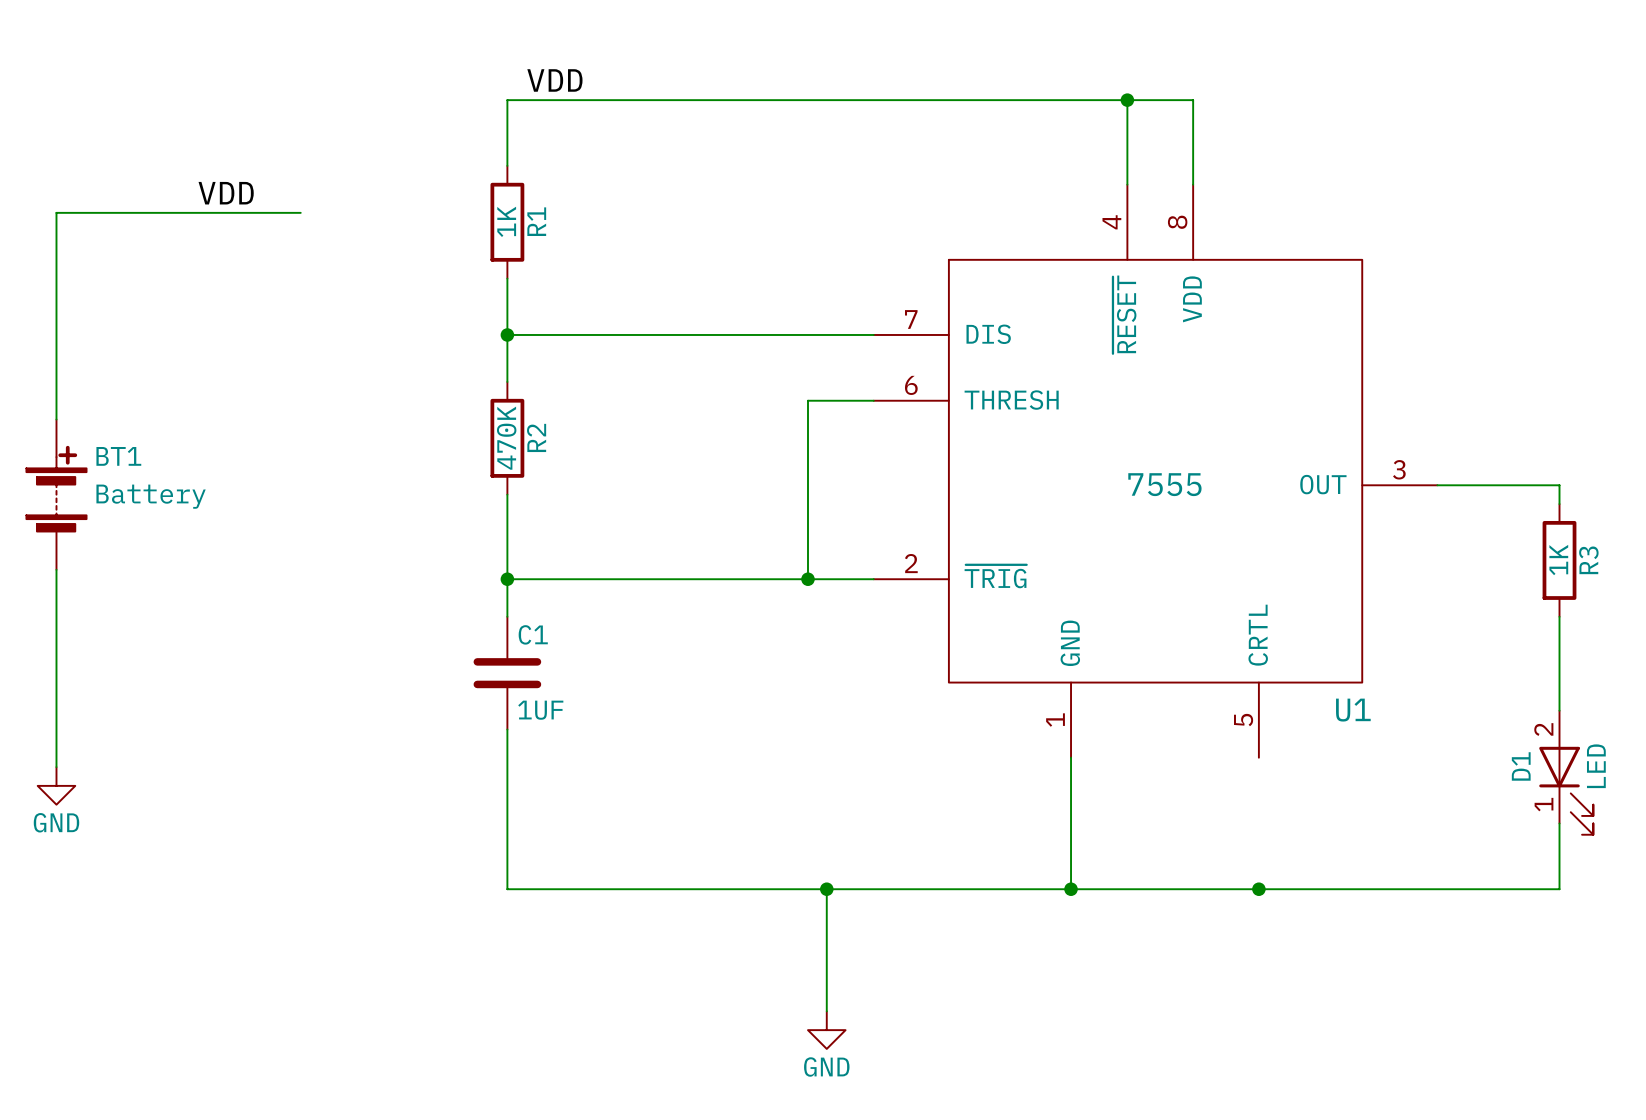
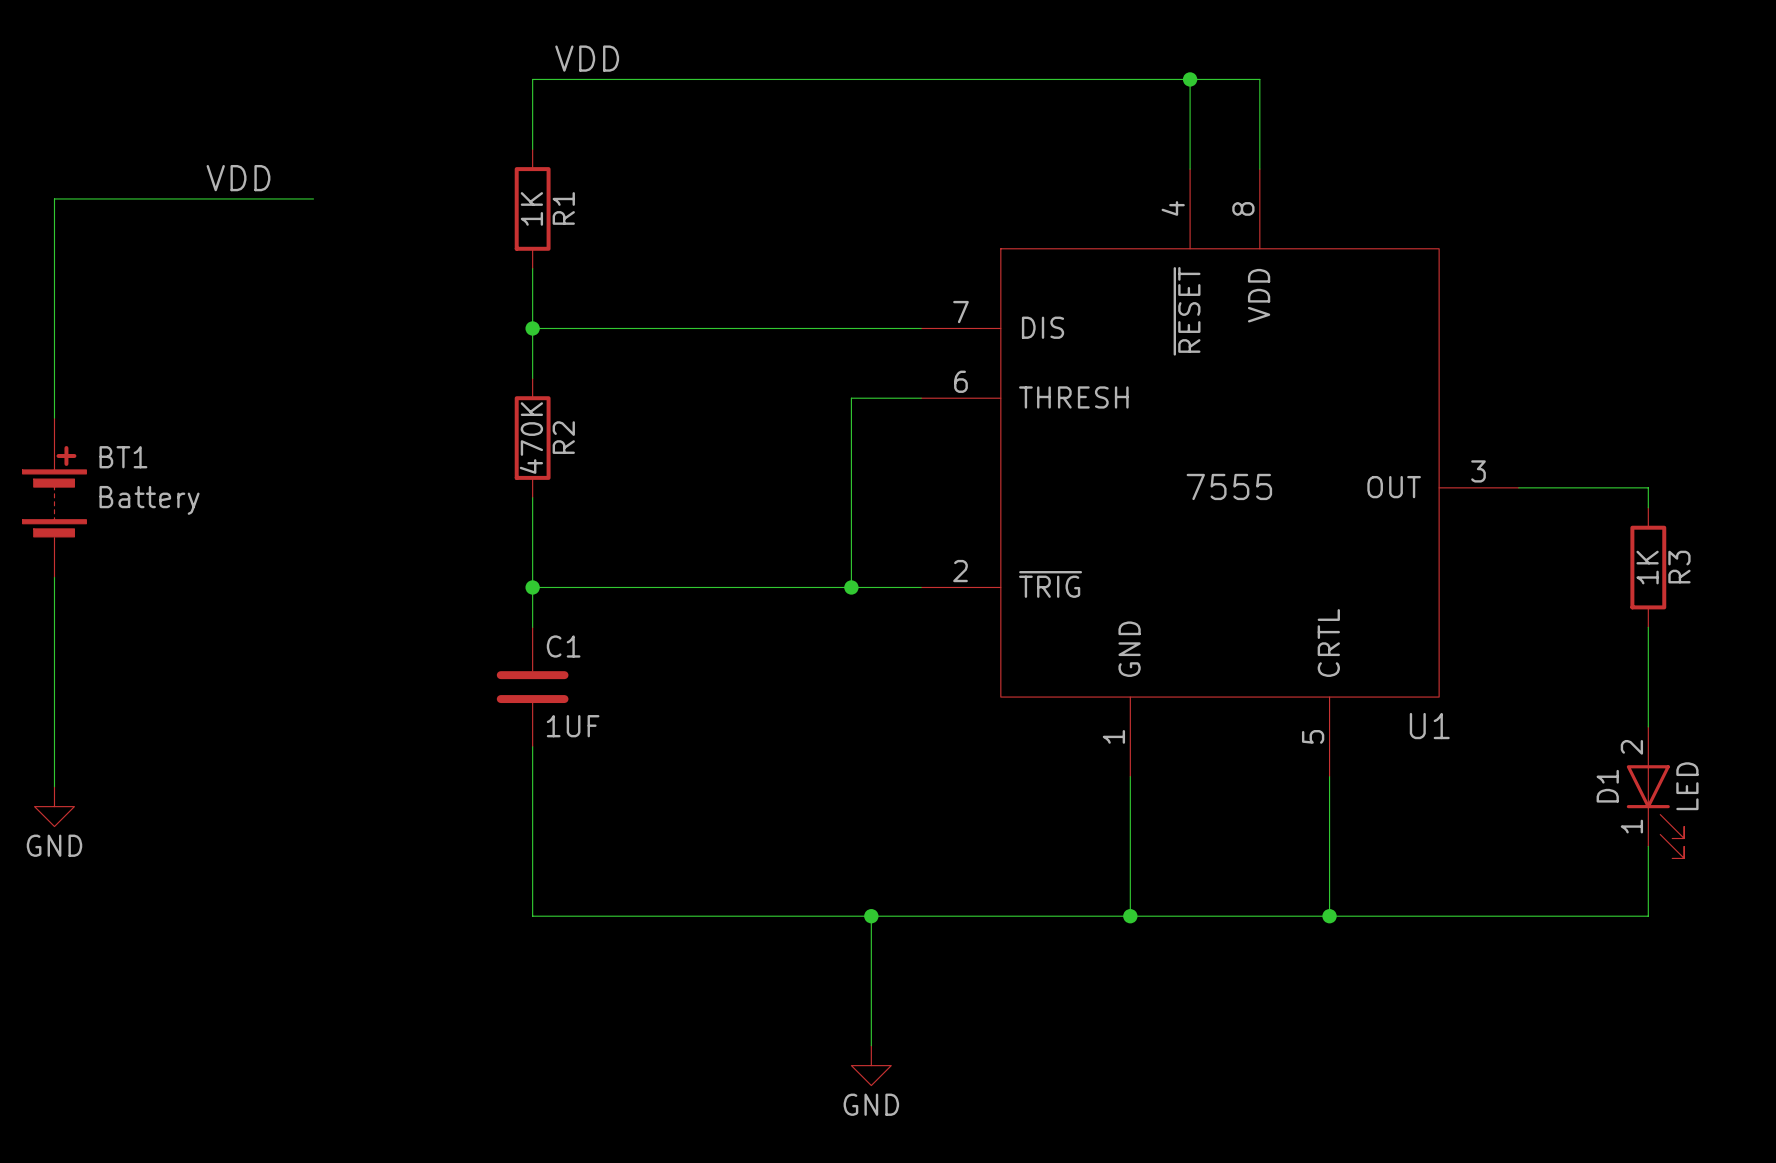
wire: none -> (1329, 776) (1329, 916)

